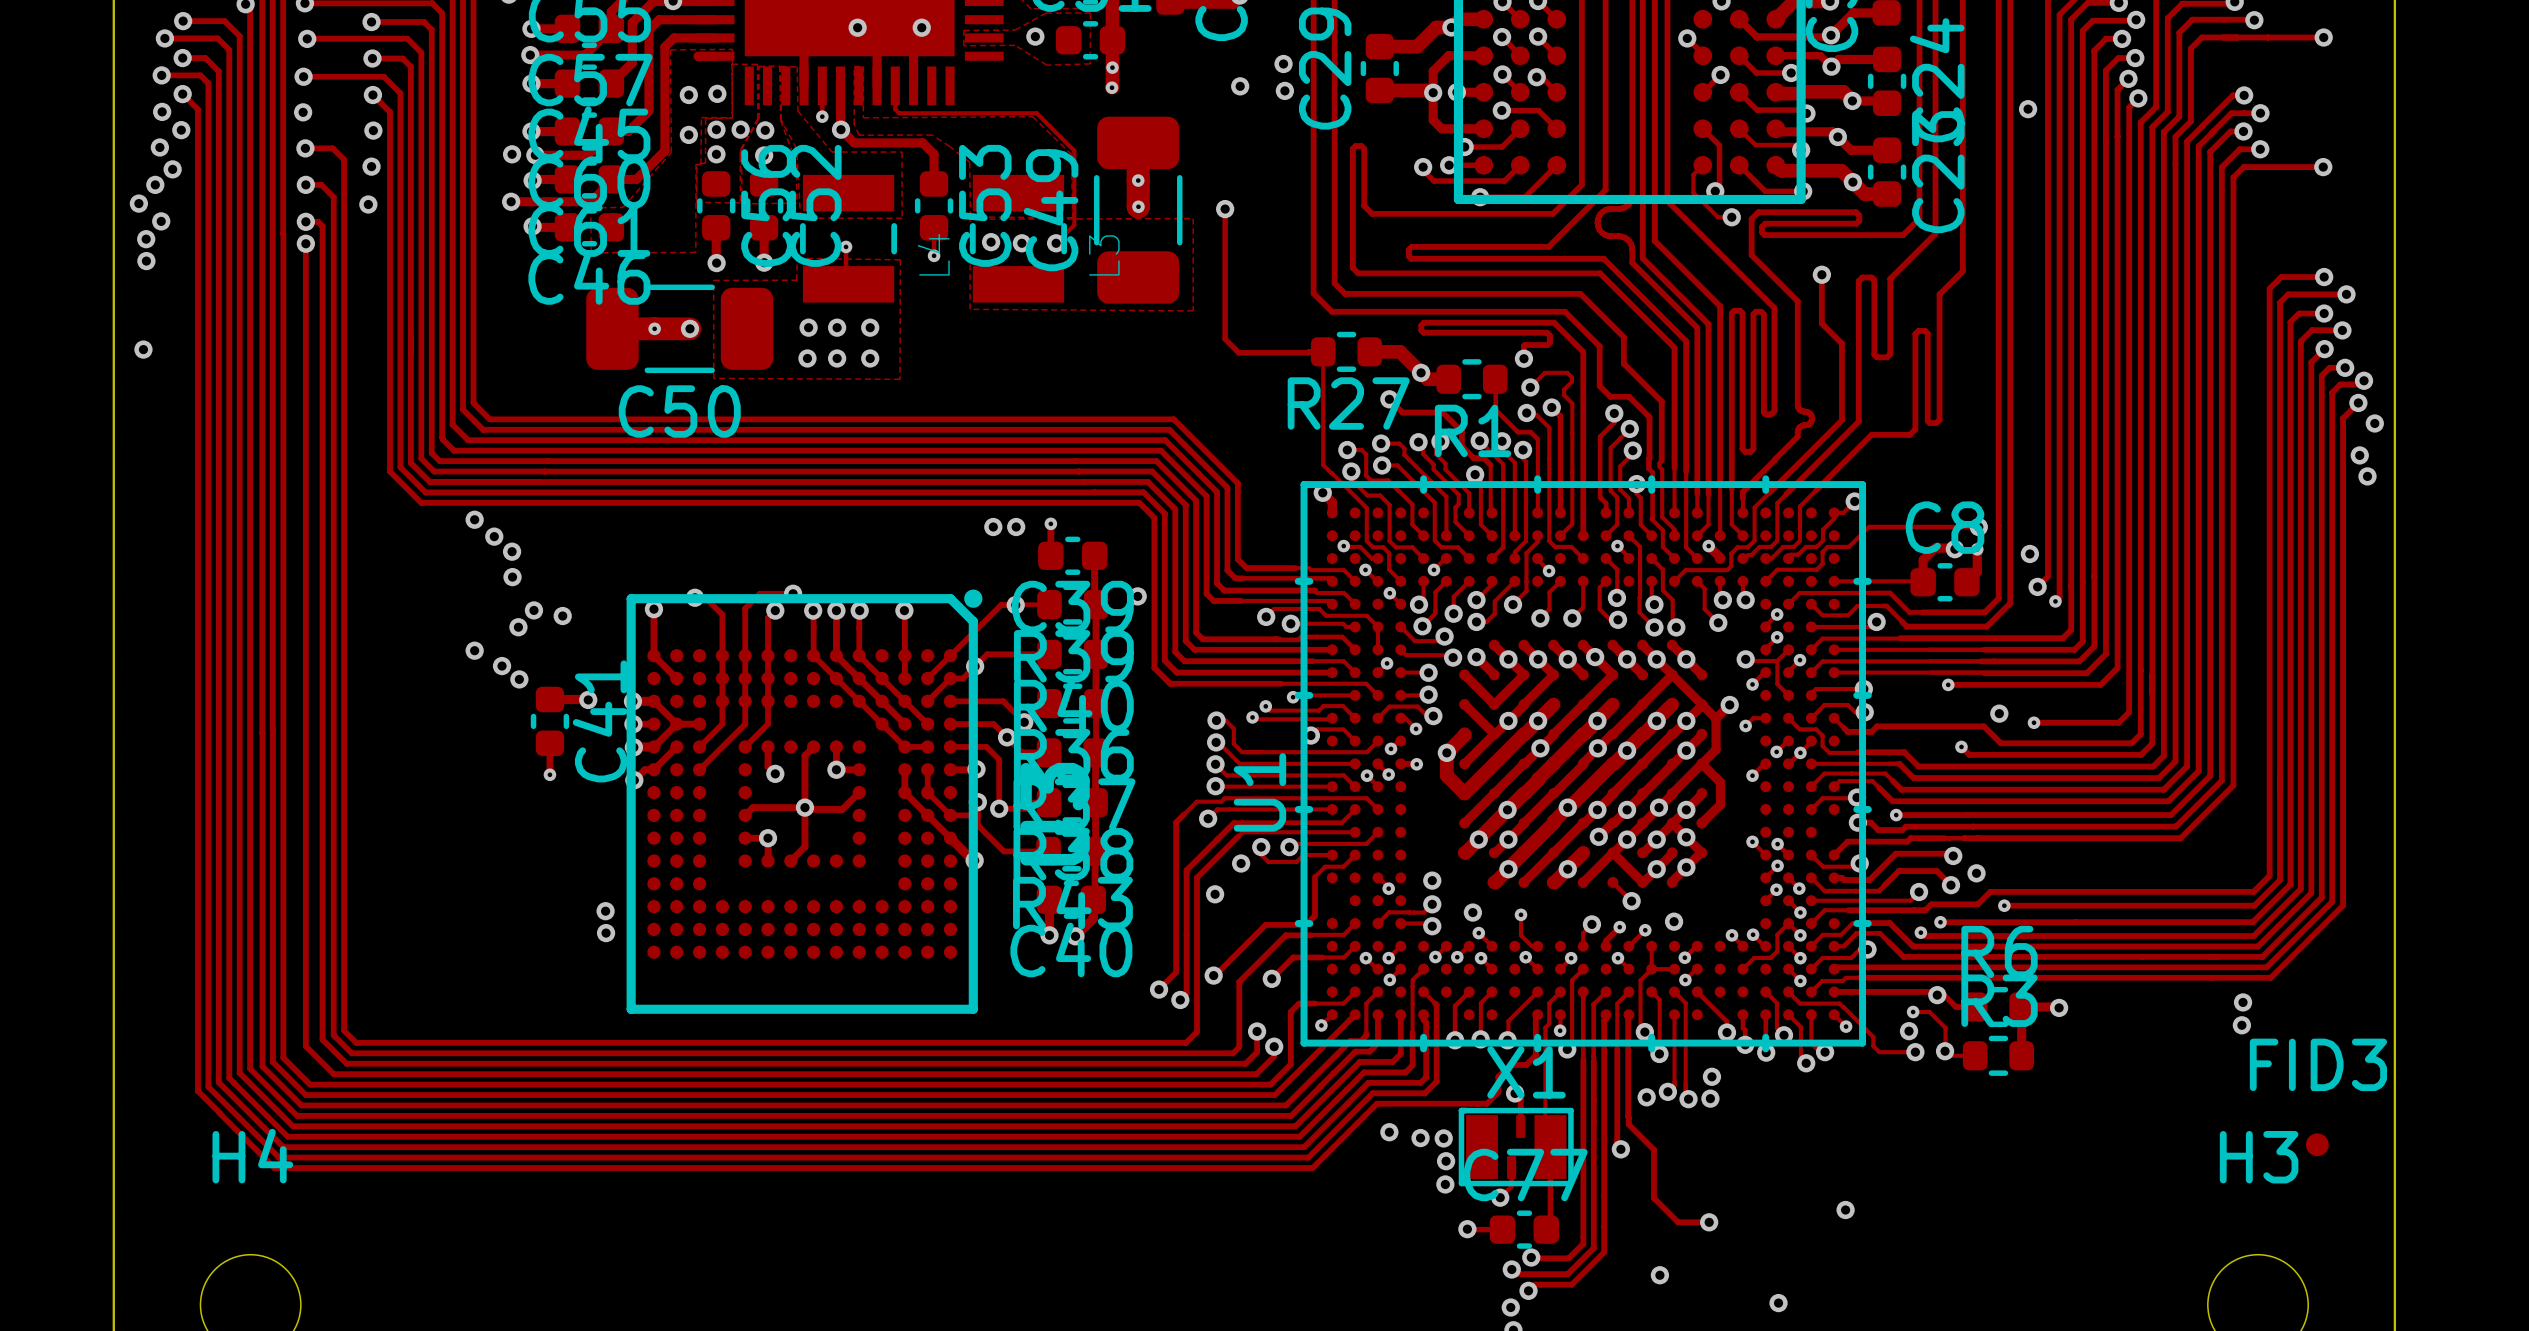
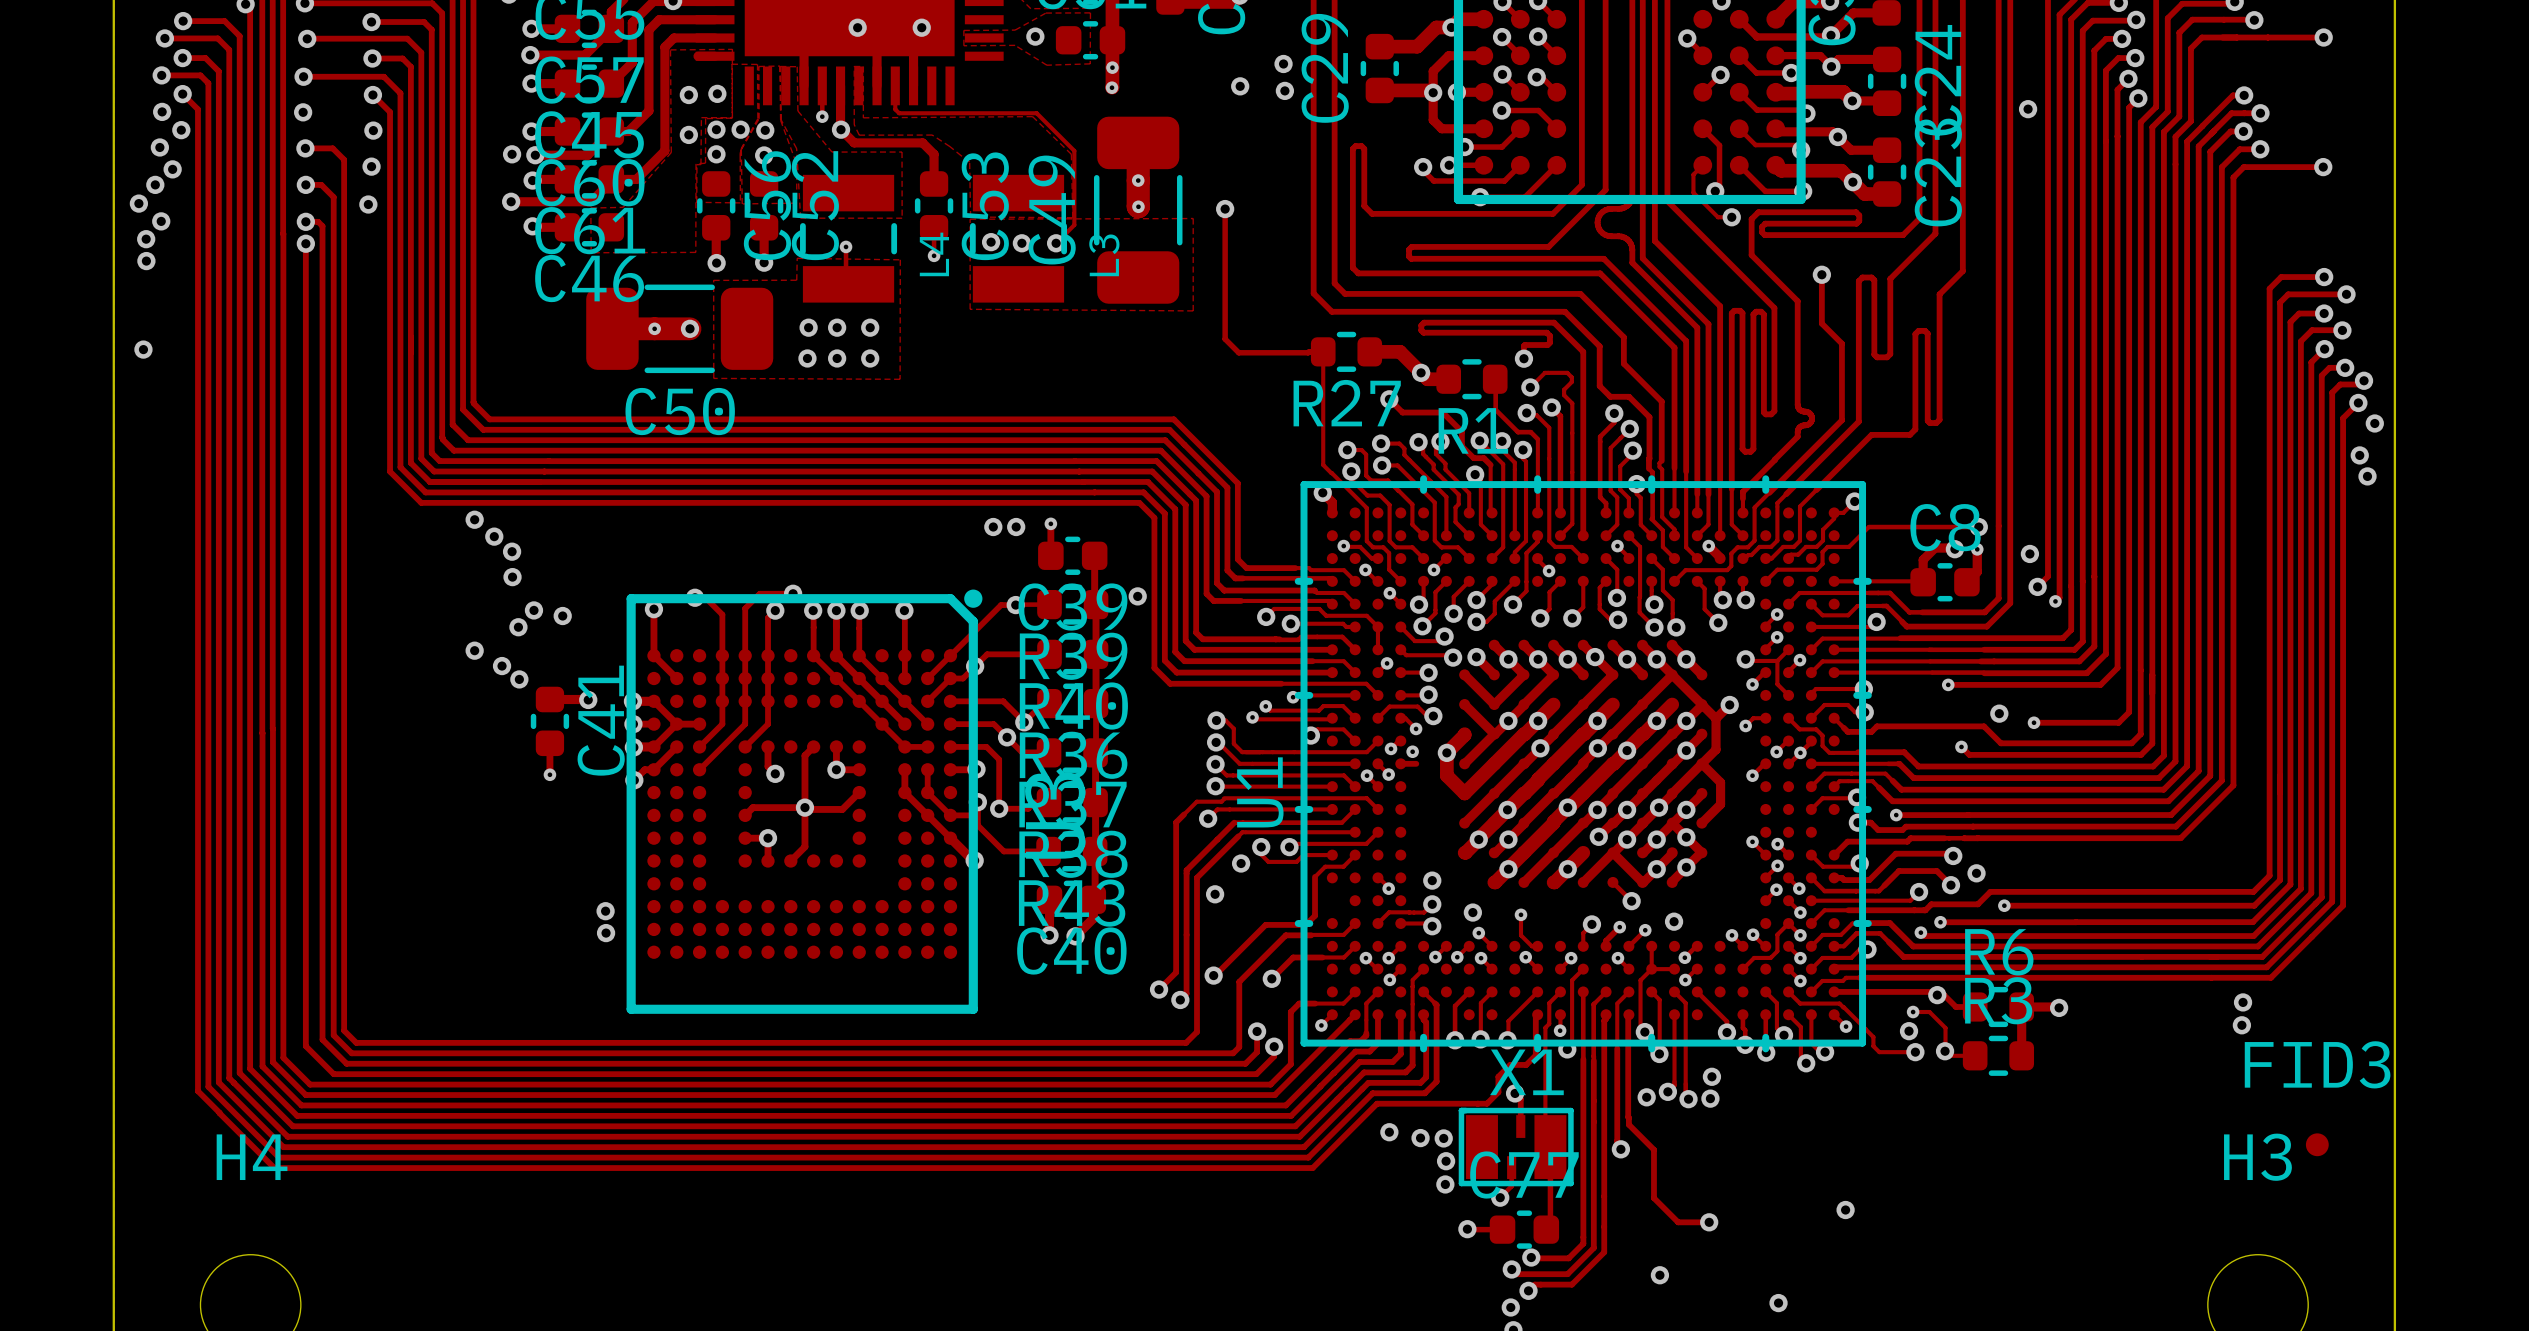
via position: (1416, 764) -> (1412, 751)

